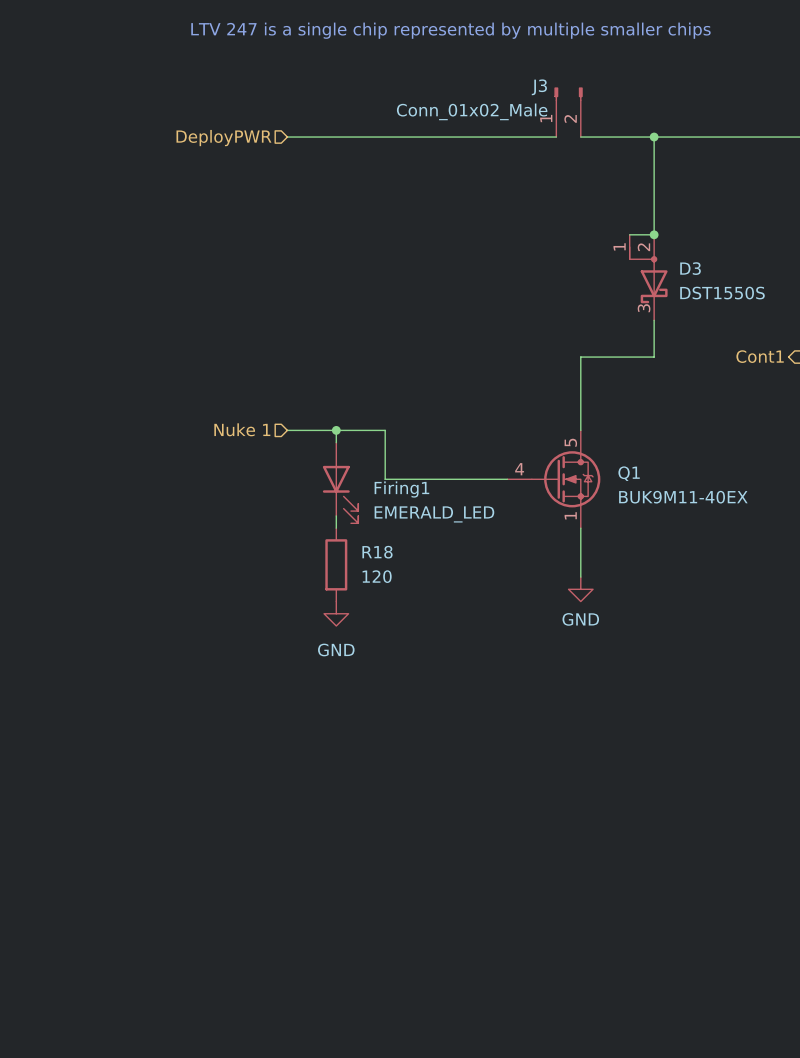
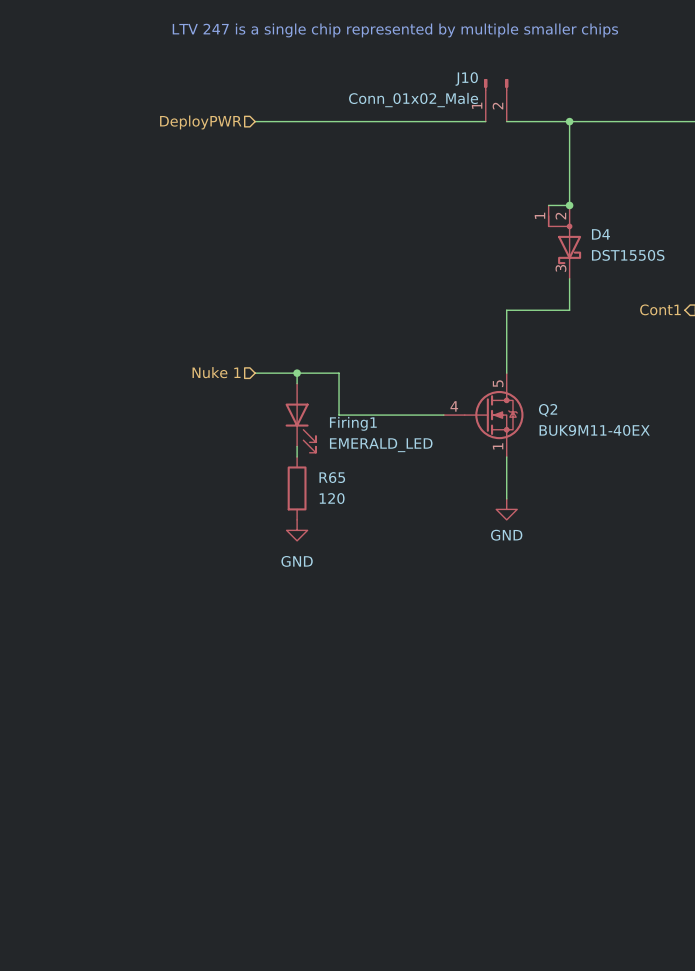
J3 name: J3 (539, 87) -> J10 (466, 78)
D3 name: D3 (690, 268) -> D4 (600, 234)
Q1 name: Q1 (629, 473) -> Q2 (548, 410)
R18 name: R18 (377, 552) -> R65 (332, 477)

